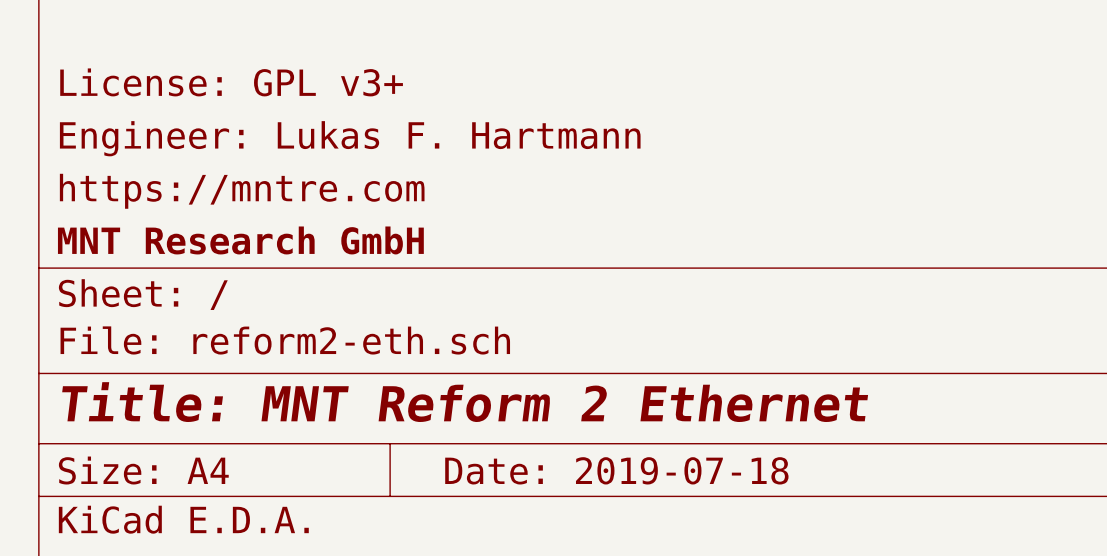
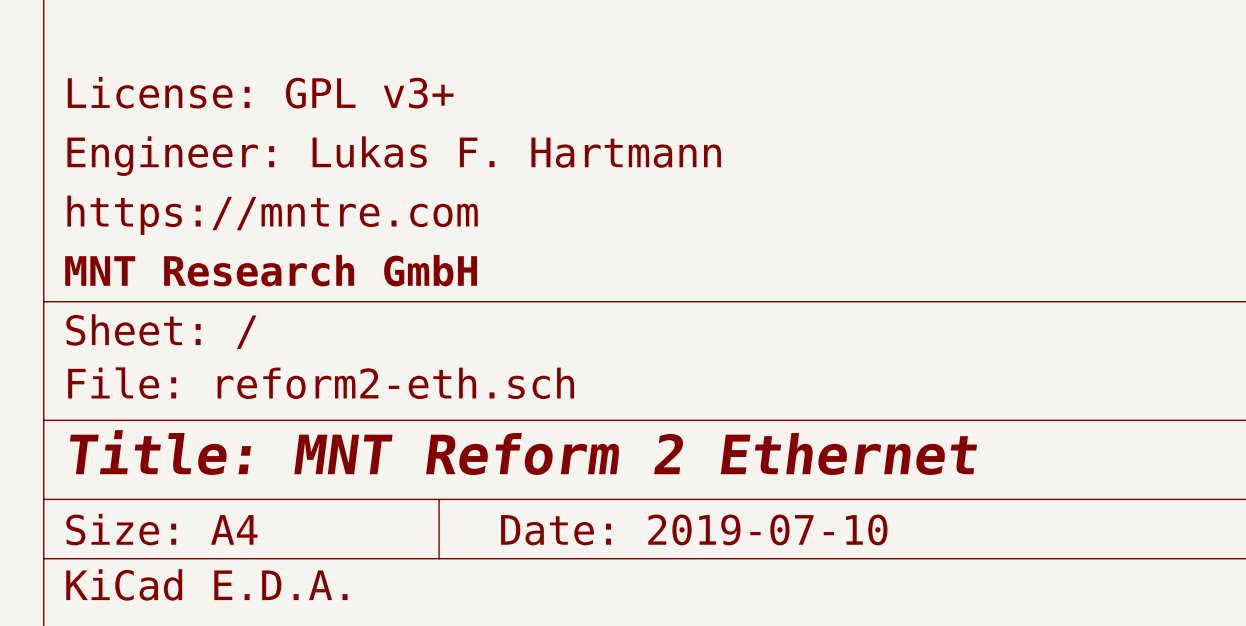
title block: Date: 2019-07-18 (616, 470) -> Date: 2019-07-10 (694, 529)

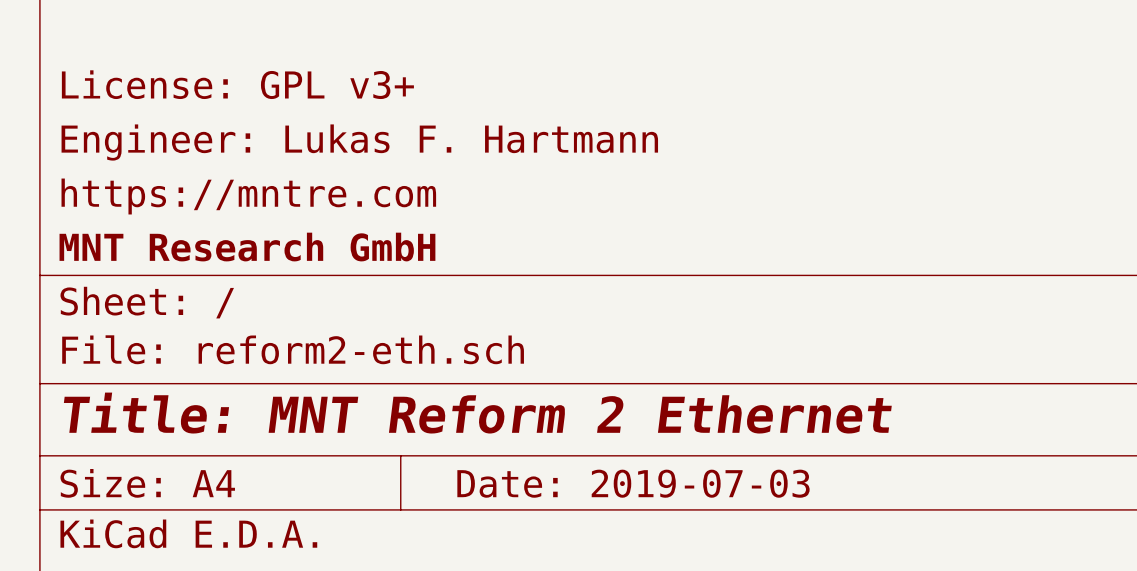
title block: Date: 2019-07-10 (694, 529) -> Date: 2019-07-03 (633, 483)

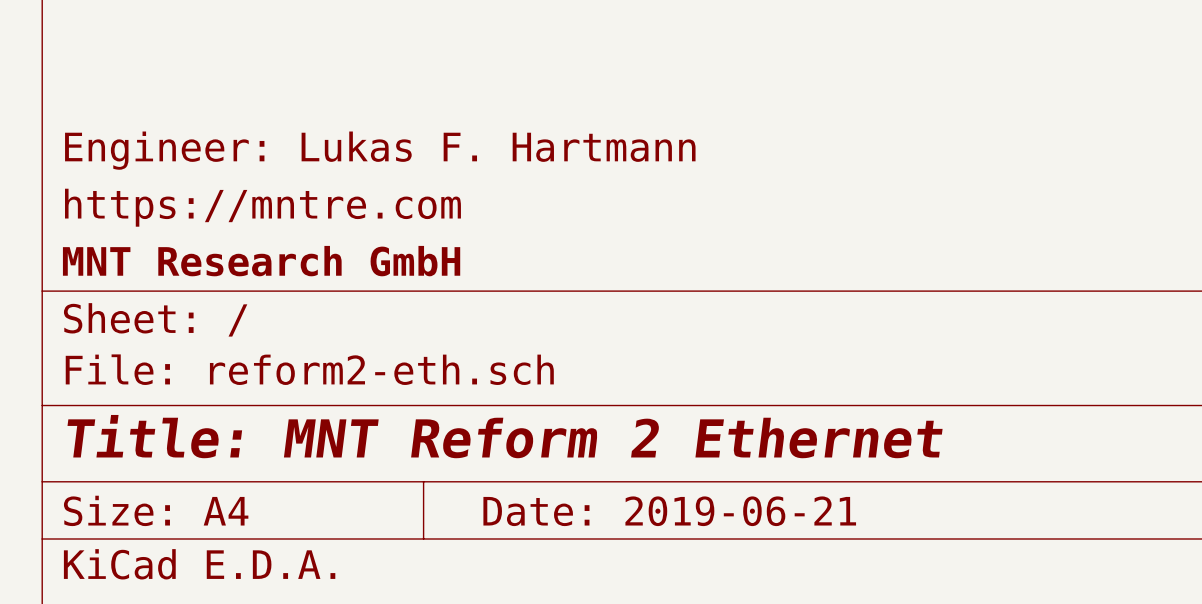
title block: License: GPL v3+ (237, 84) -> none
title block: Date: 2019-07-03 (633, 483) -> Date: 2019-06-21 (669, 511)

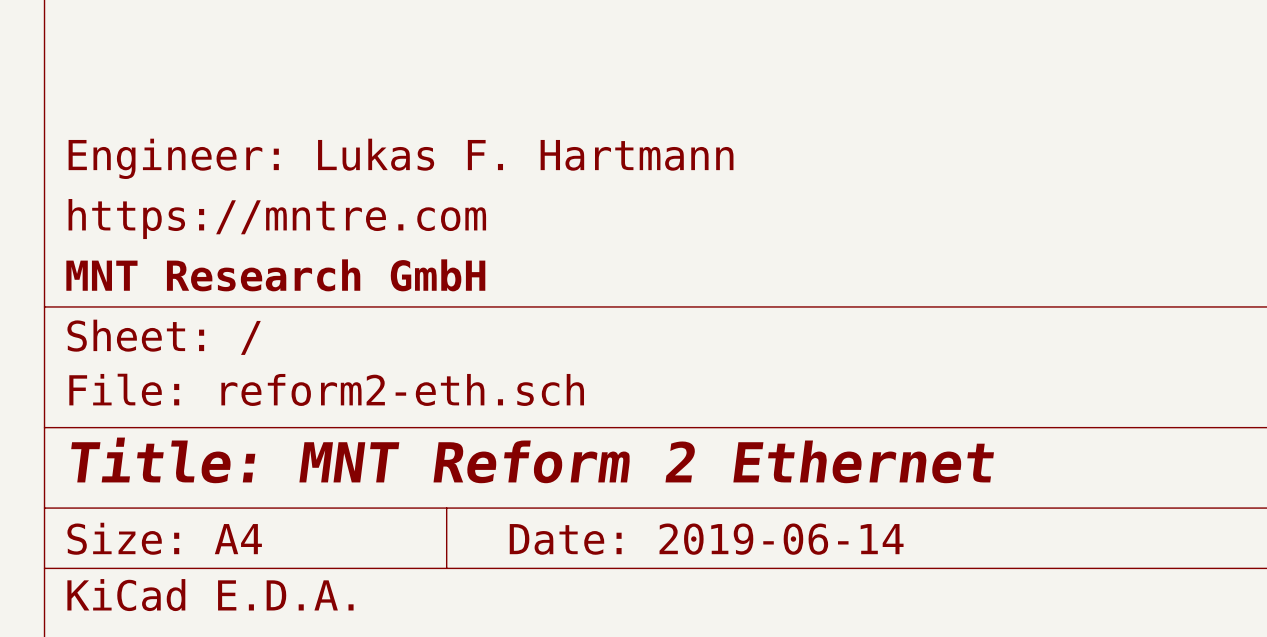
title block: Date: 2019-06-21 (669, 511) -> Date: 2019-06-14 (706, 539)

